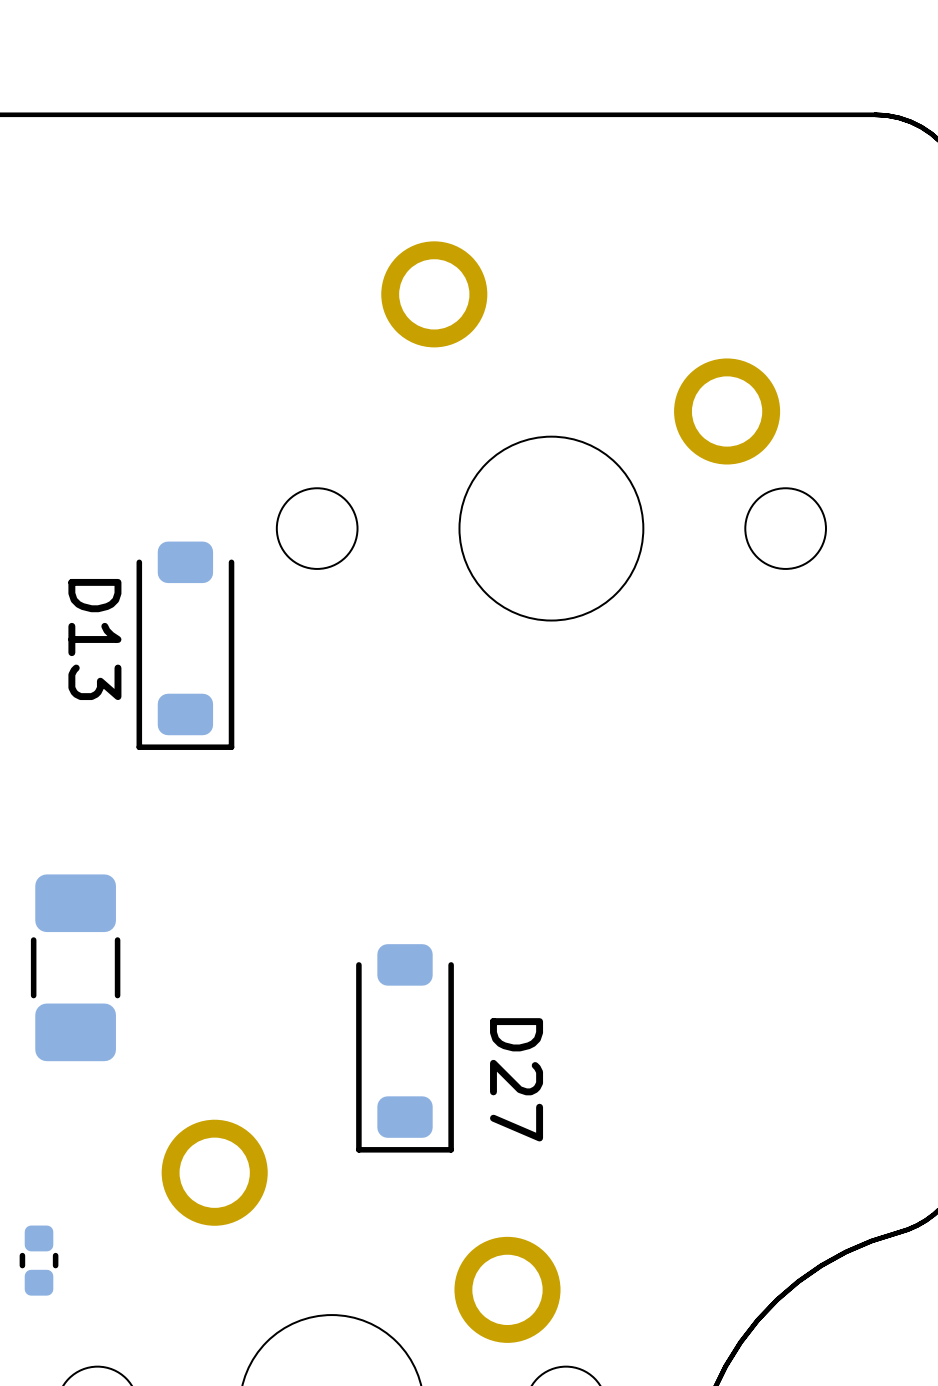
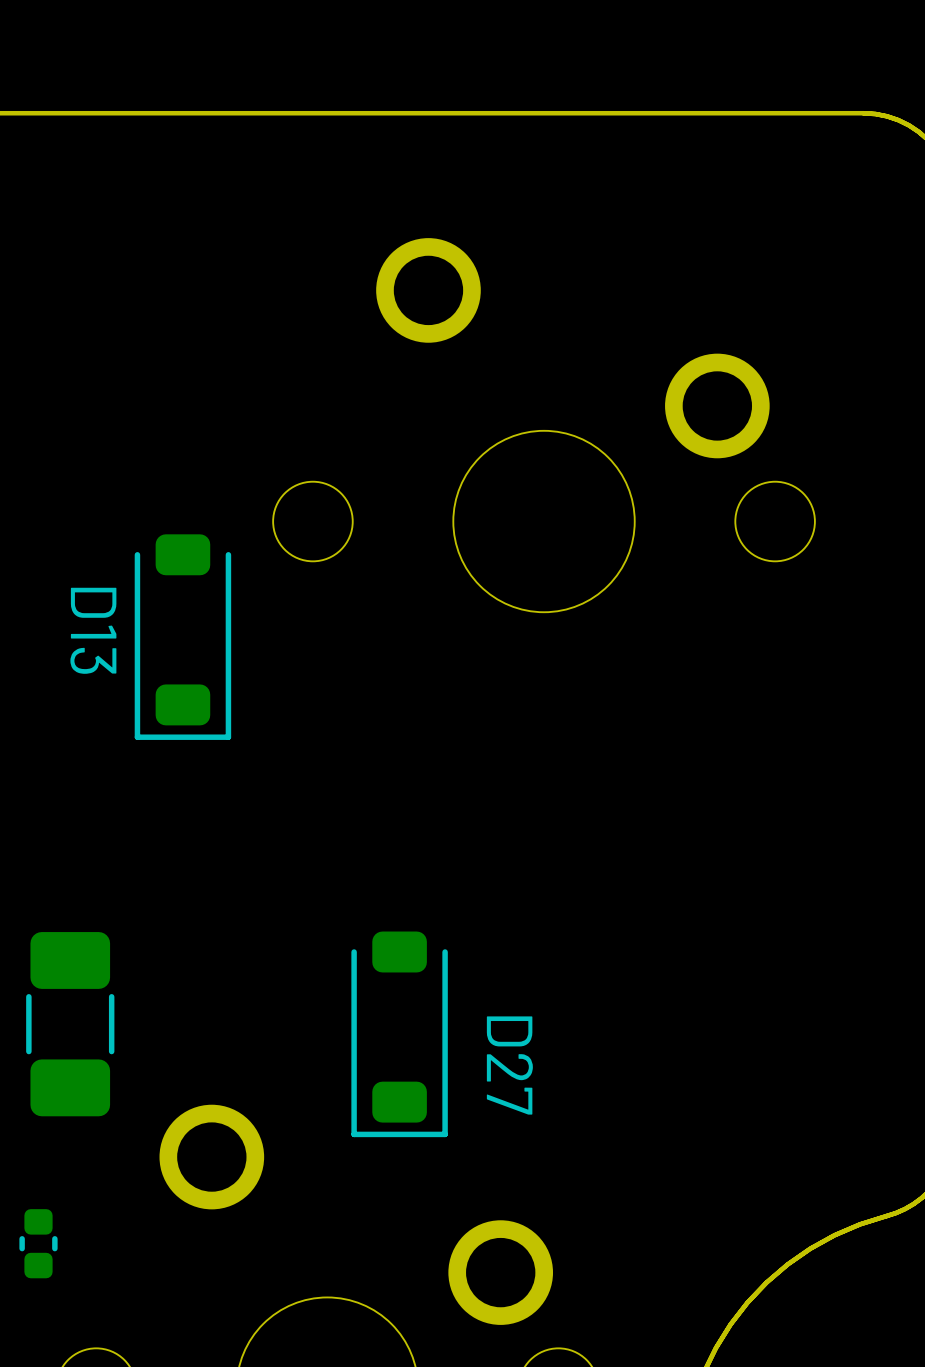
part position: (75, 967) -> (70, 1024)

